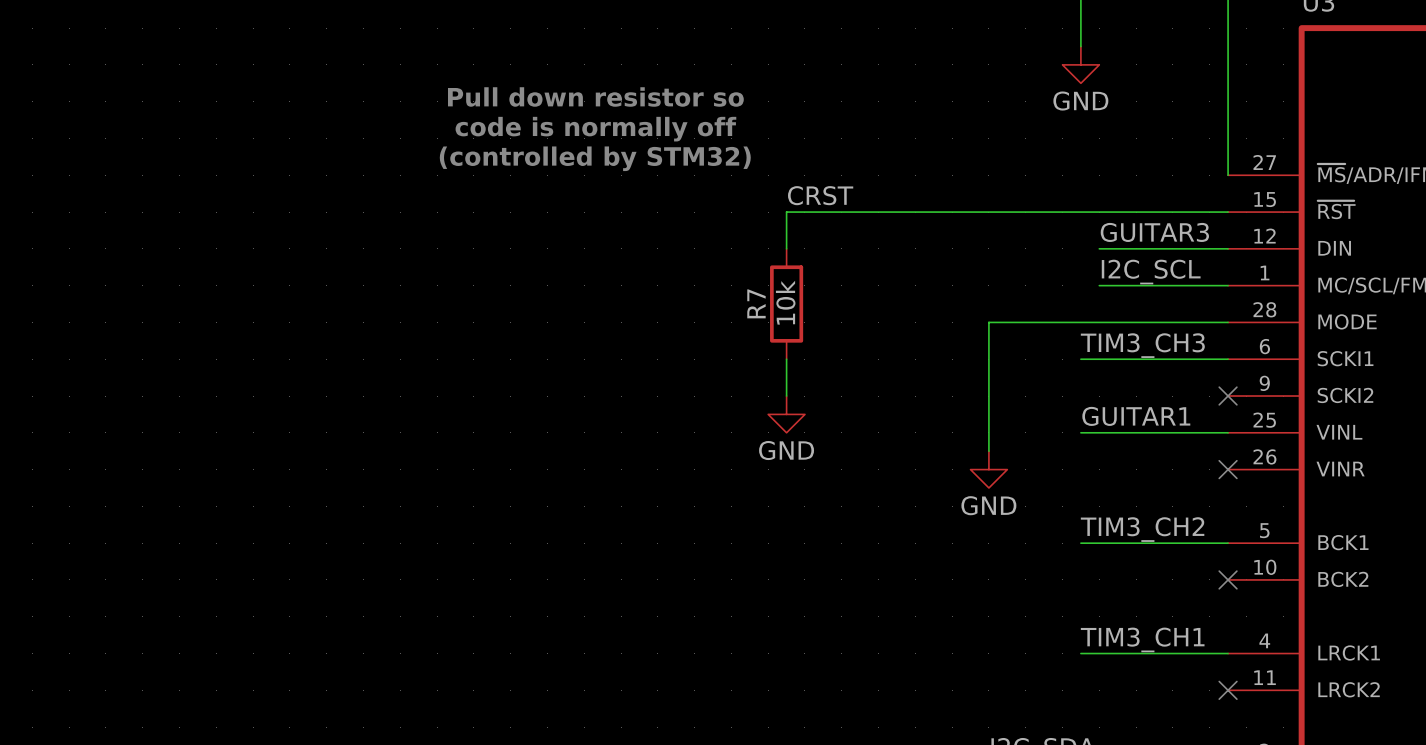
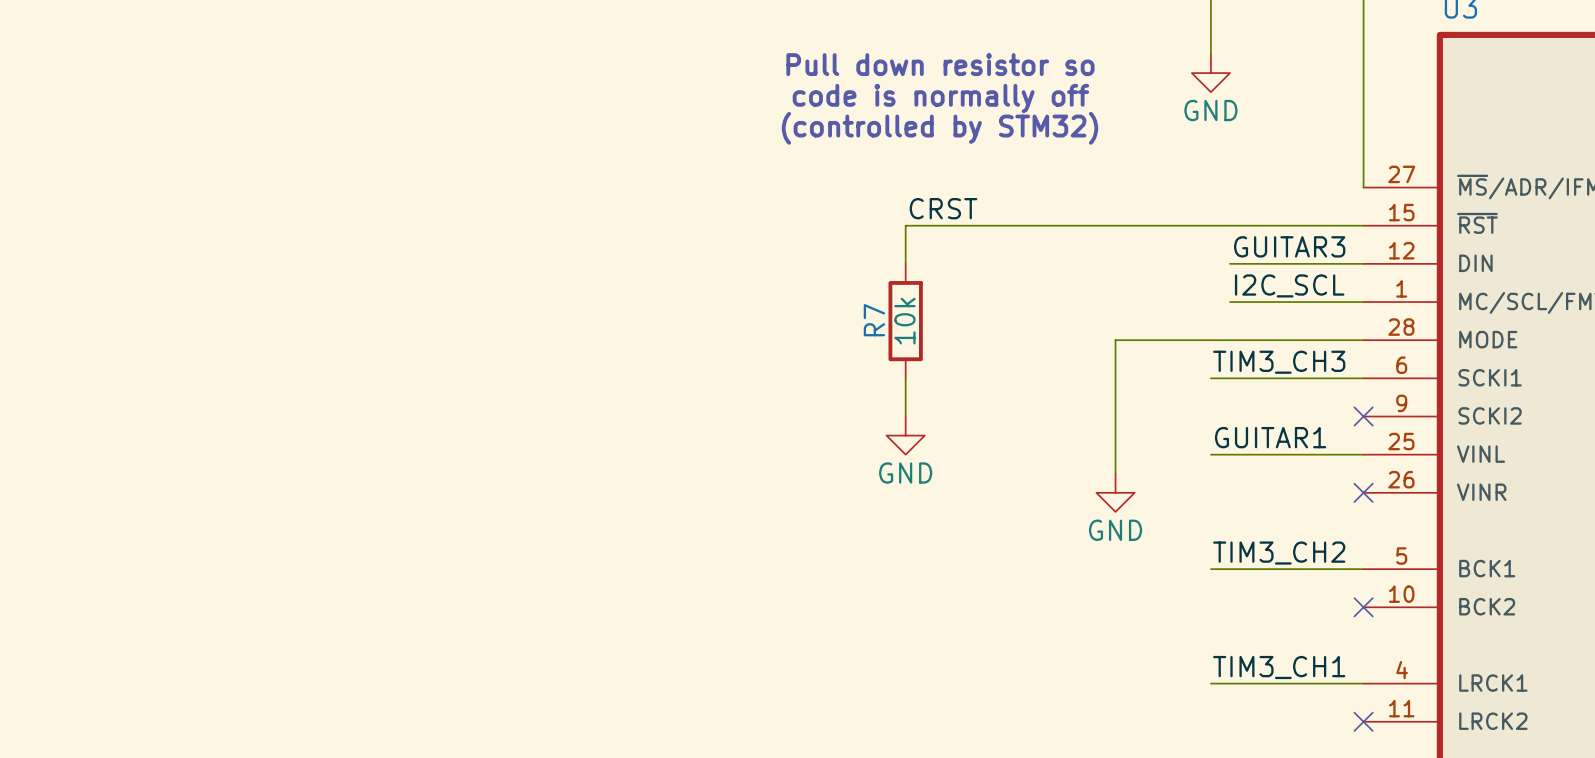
text position: Pull down resistor so (595, 96) -> Pull down resistor so (940, 64)
text position: code is normally off (595, 129) -> code is normally off (940, 98)
text position: (controlled by STM32) (595, 158) -> (controlled by STM32) (940, 128)

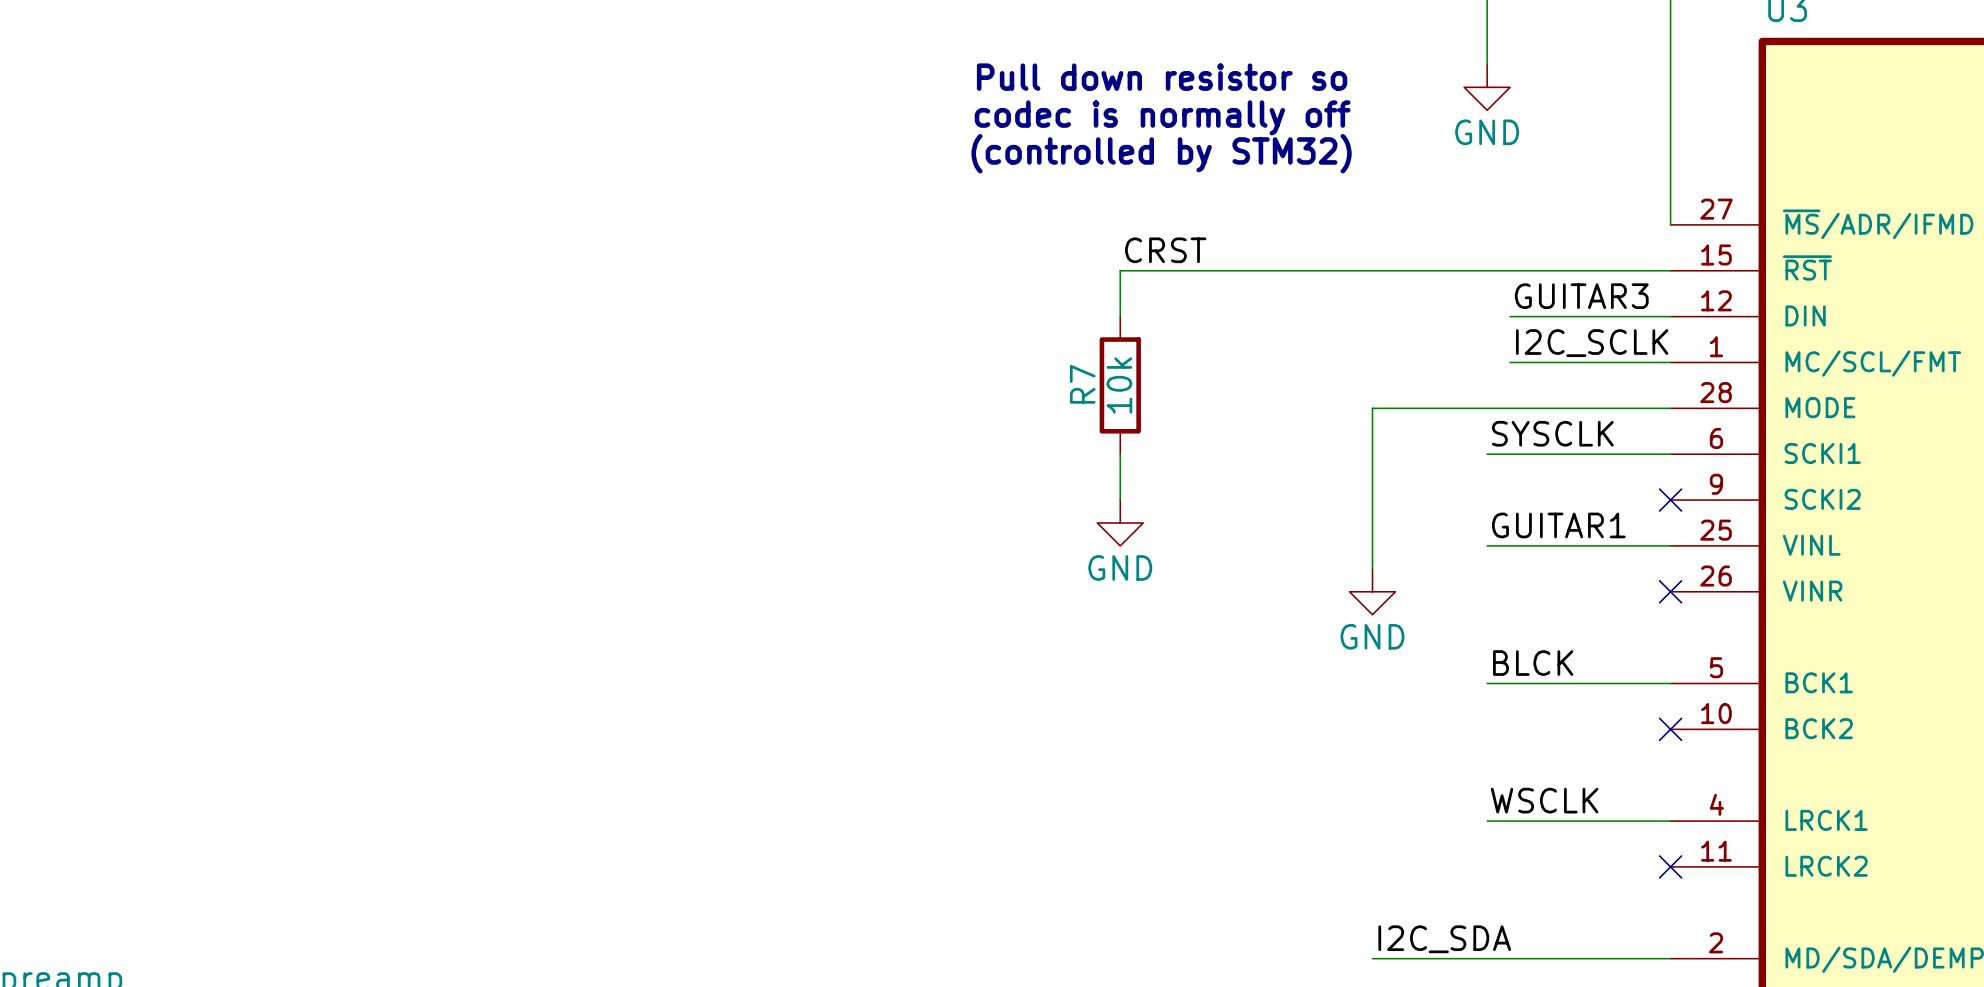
text: code is normally off (940, 98) -> codec is normally off (1162, 117)
label: I2C_SCL (1289, 285) -> I2C_SCLK (1592, 343)
label: TIM3_CH3 (1279, 362) -> SYSCLK (1552, 433)
label: TIM3_CH2 (1279, 553) -> BLCK (1533, 663)
label: TIM3_CH1 (1279, 667) -> WSCLK (1544, 800)

